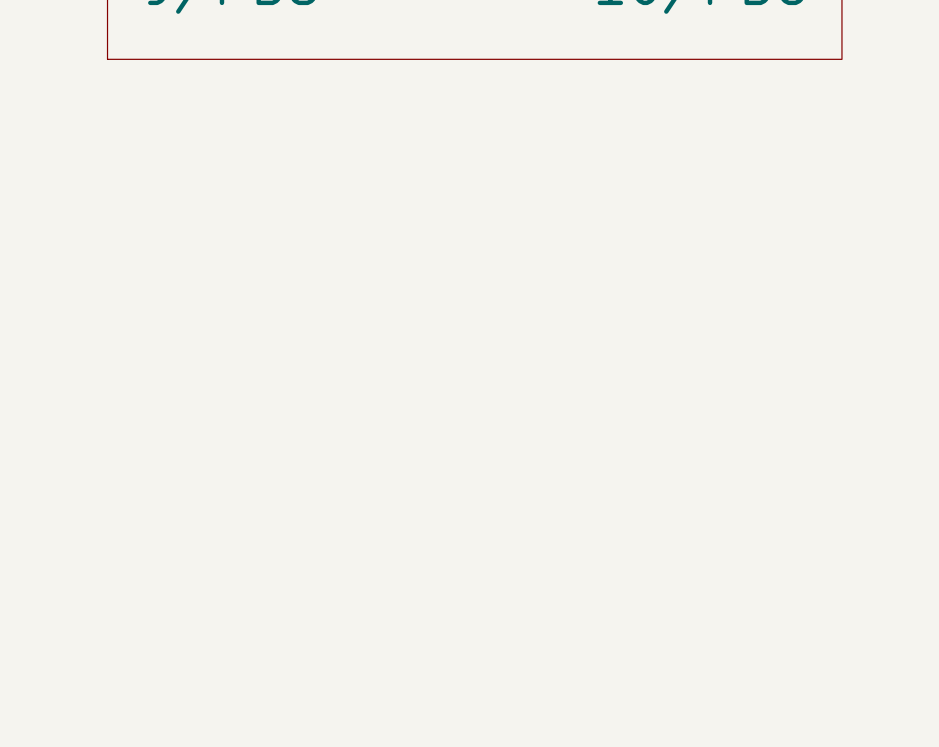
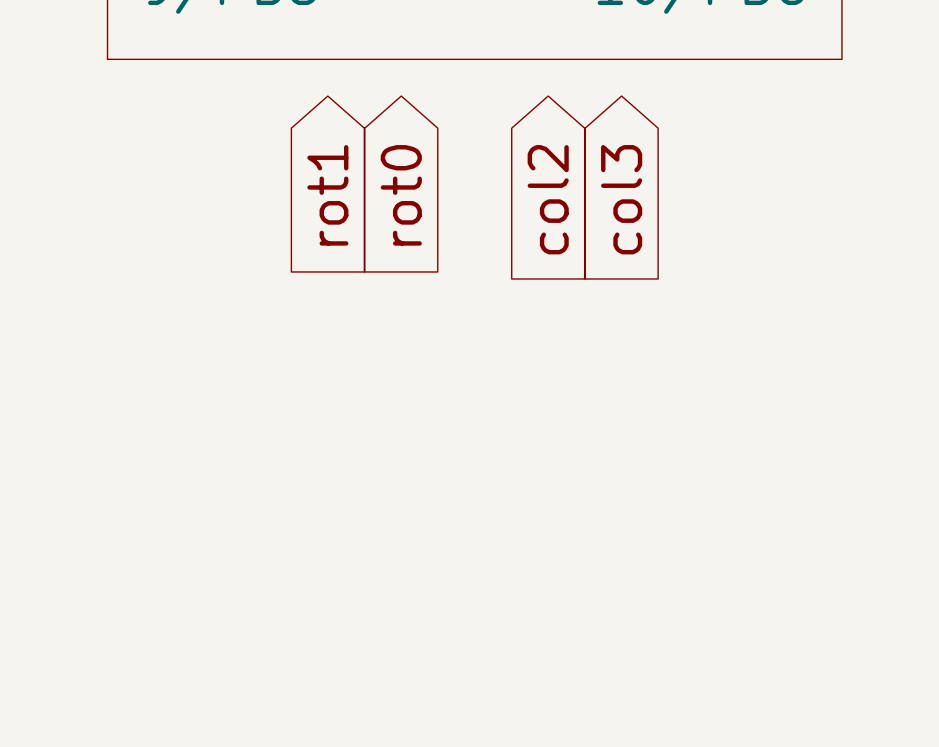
global label: none -> rot1 (327, 195)
global label: none -> rot0 (401, 195)
global label: none -> col2 (548, 199)
global label: none -> col3 (621, 199)

